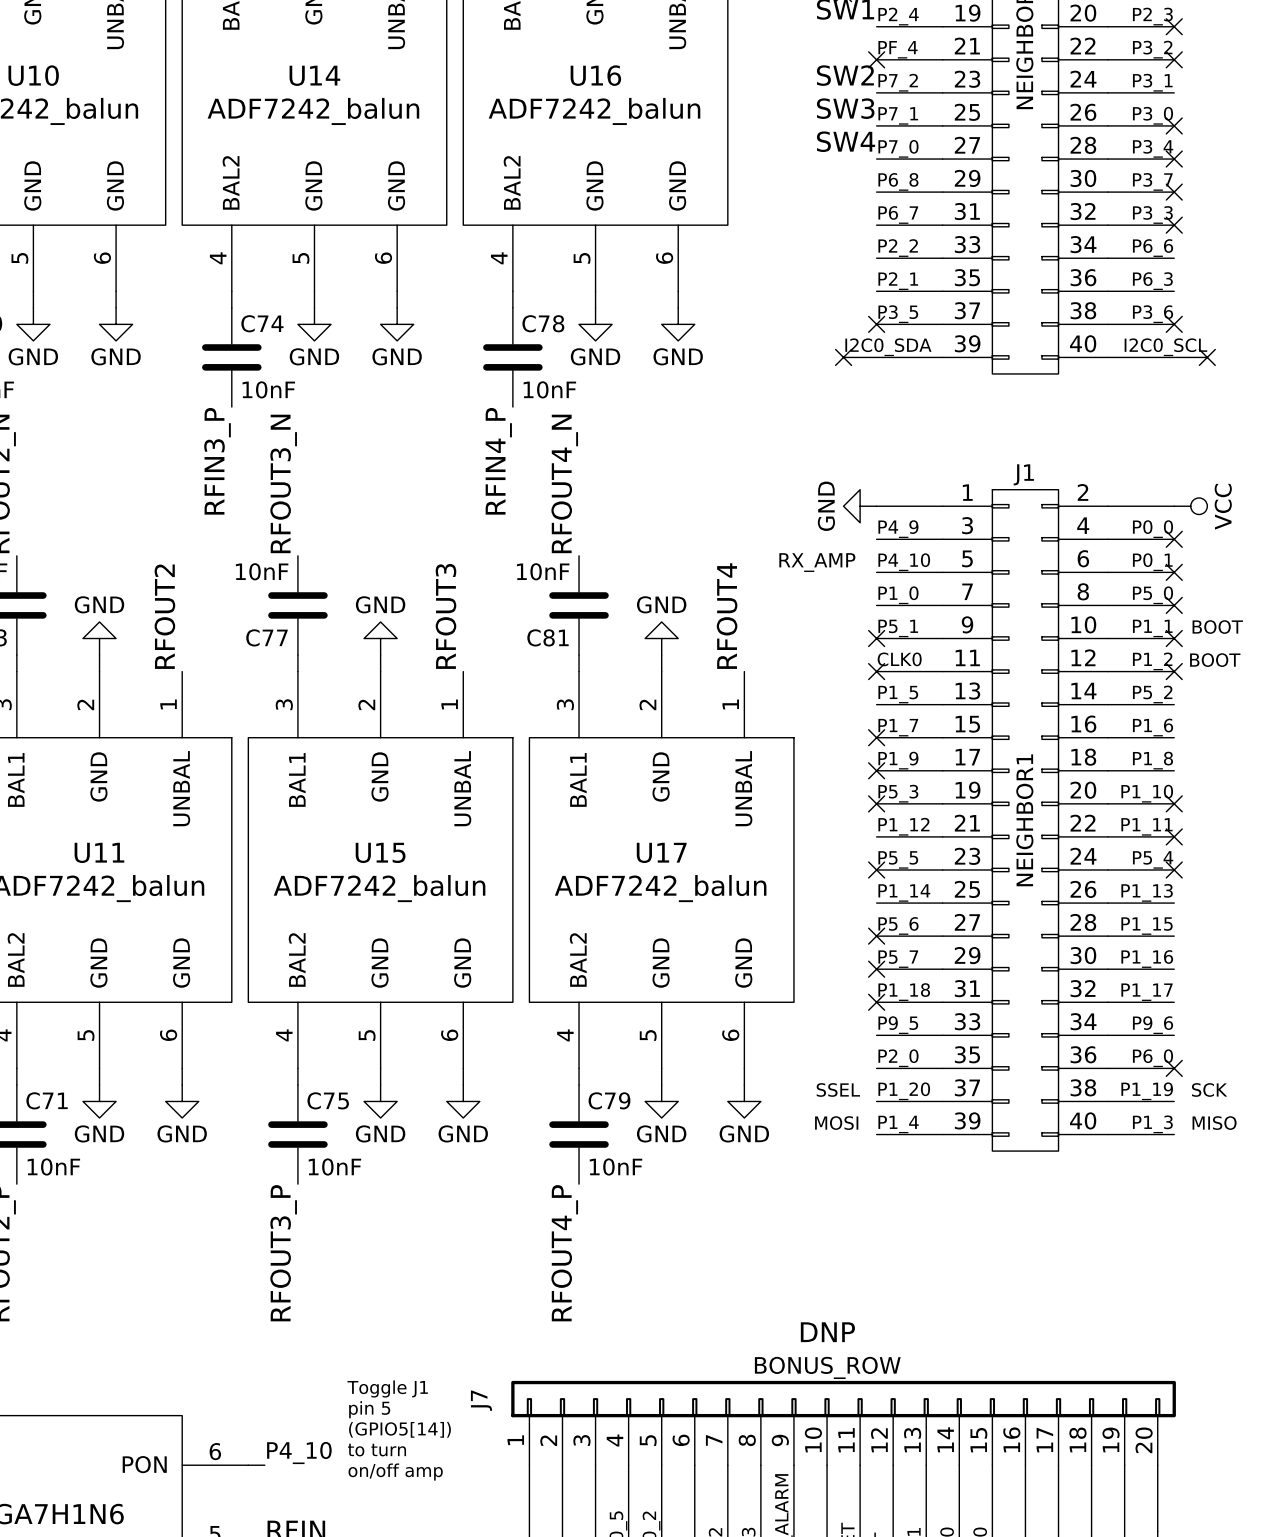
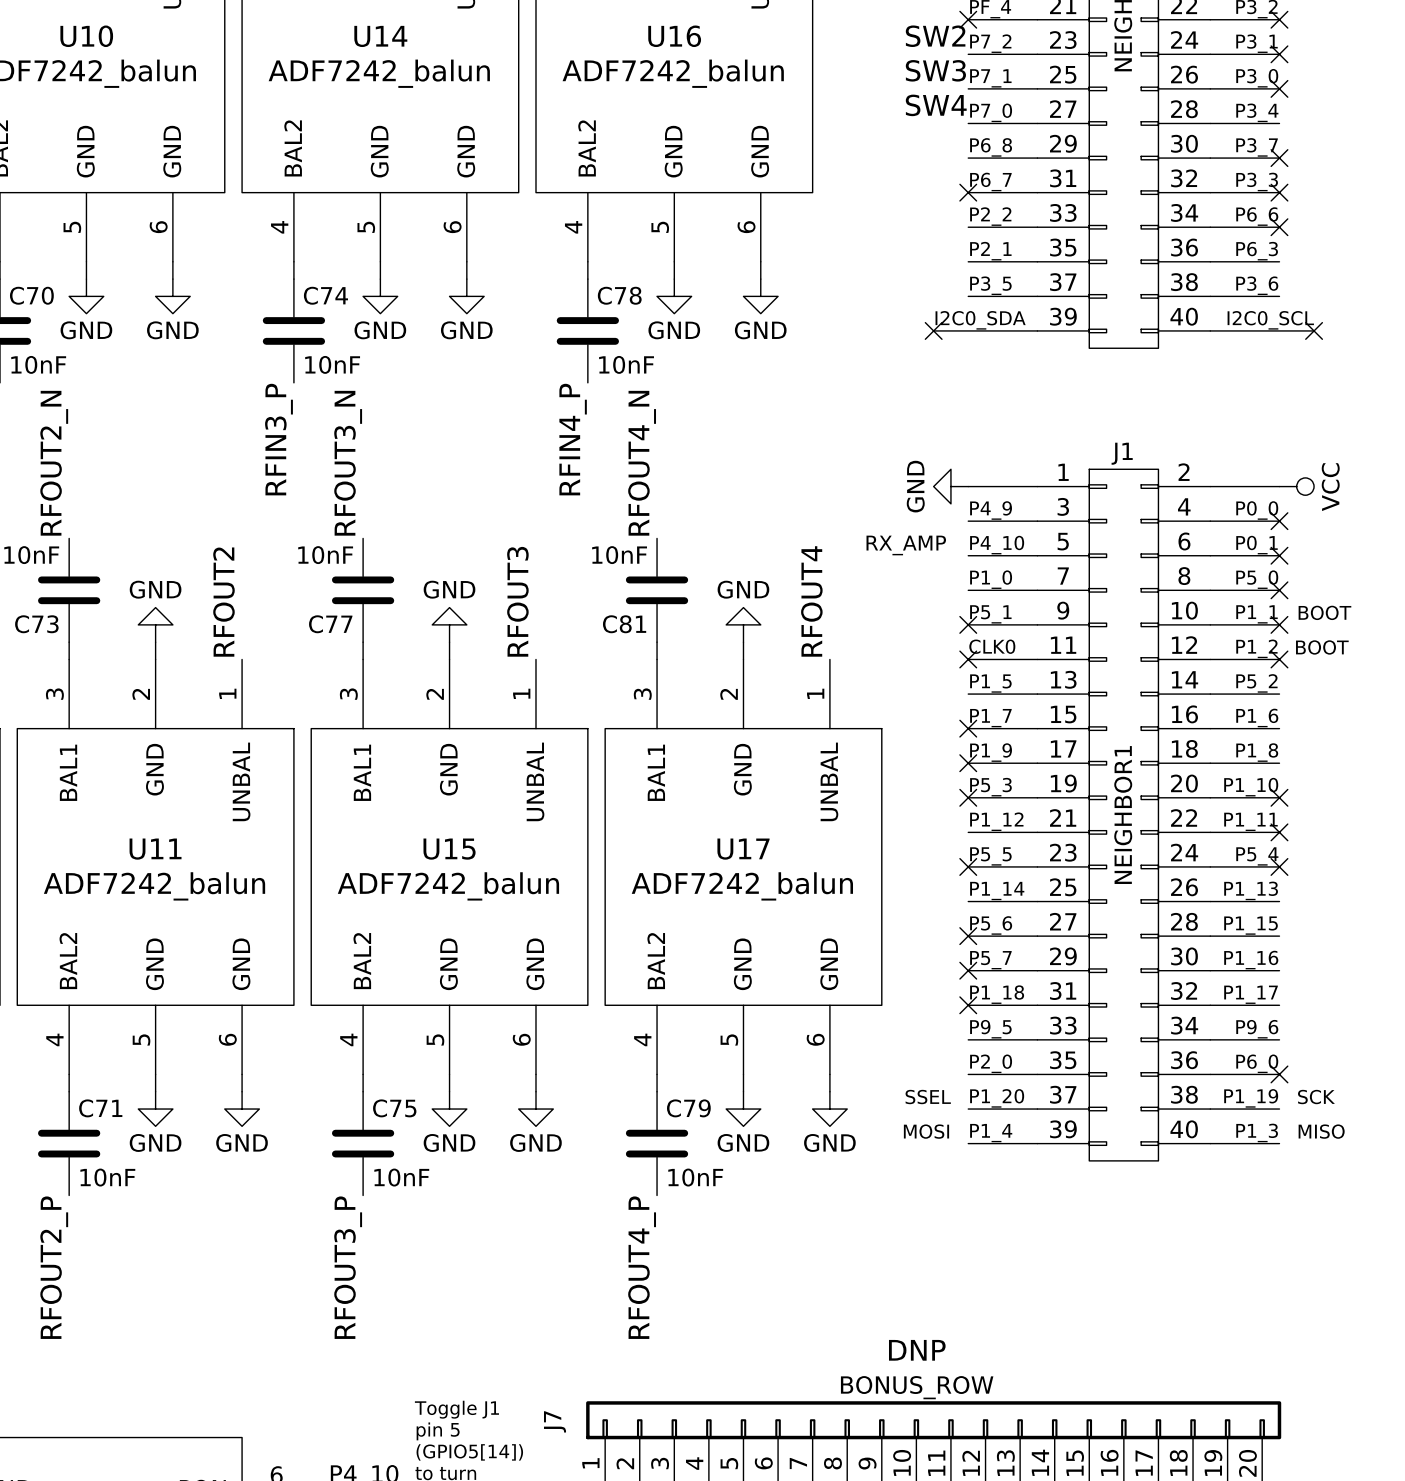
no-connect mark: none -> (1279, 54)
no-connect mark: (1174, 159) -> none
no-connect mark: none -> (968, 192)
no-connect mark: none -> (1279, 227)
no-connect mark: (876, 324) -> none
no-connect mark: (1174, 324) -> none

